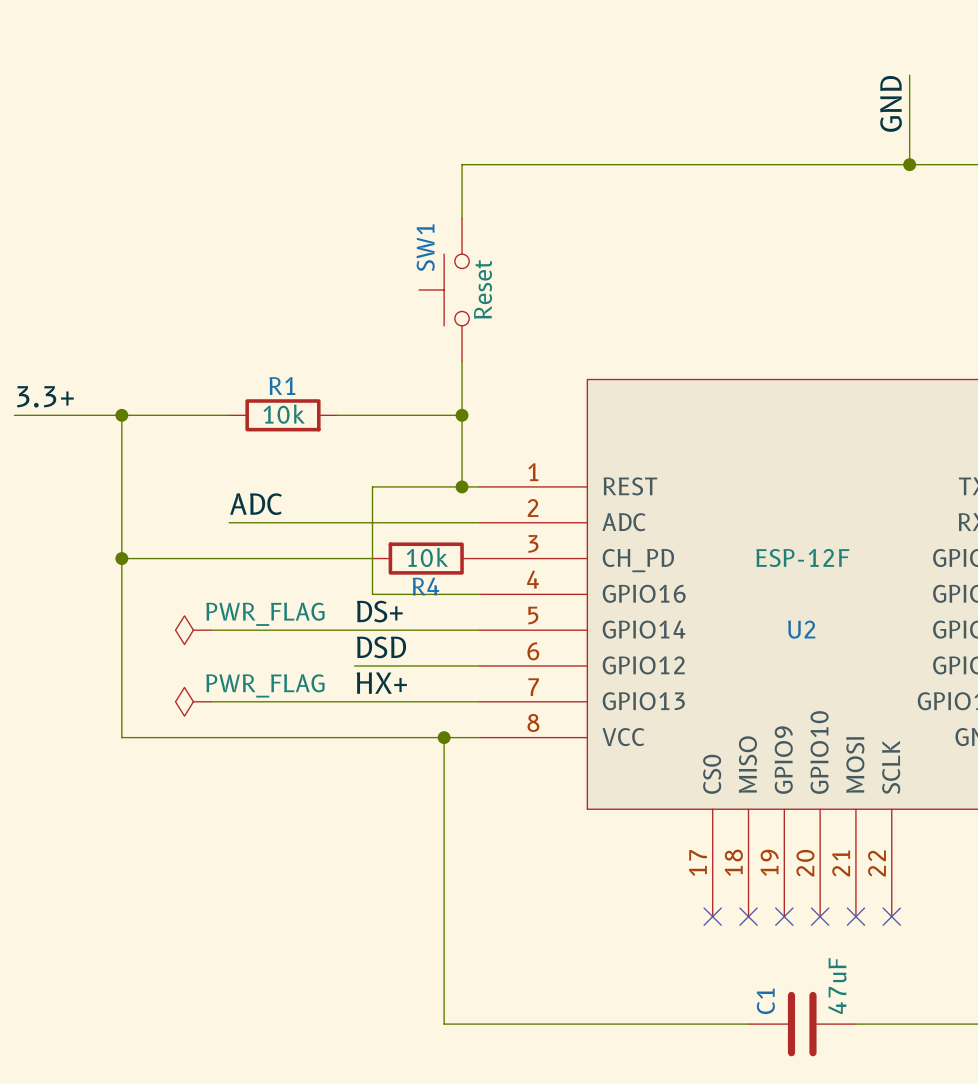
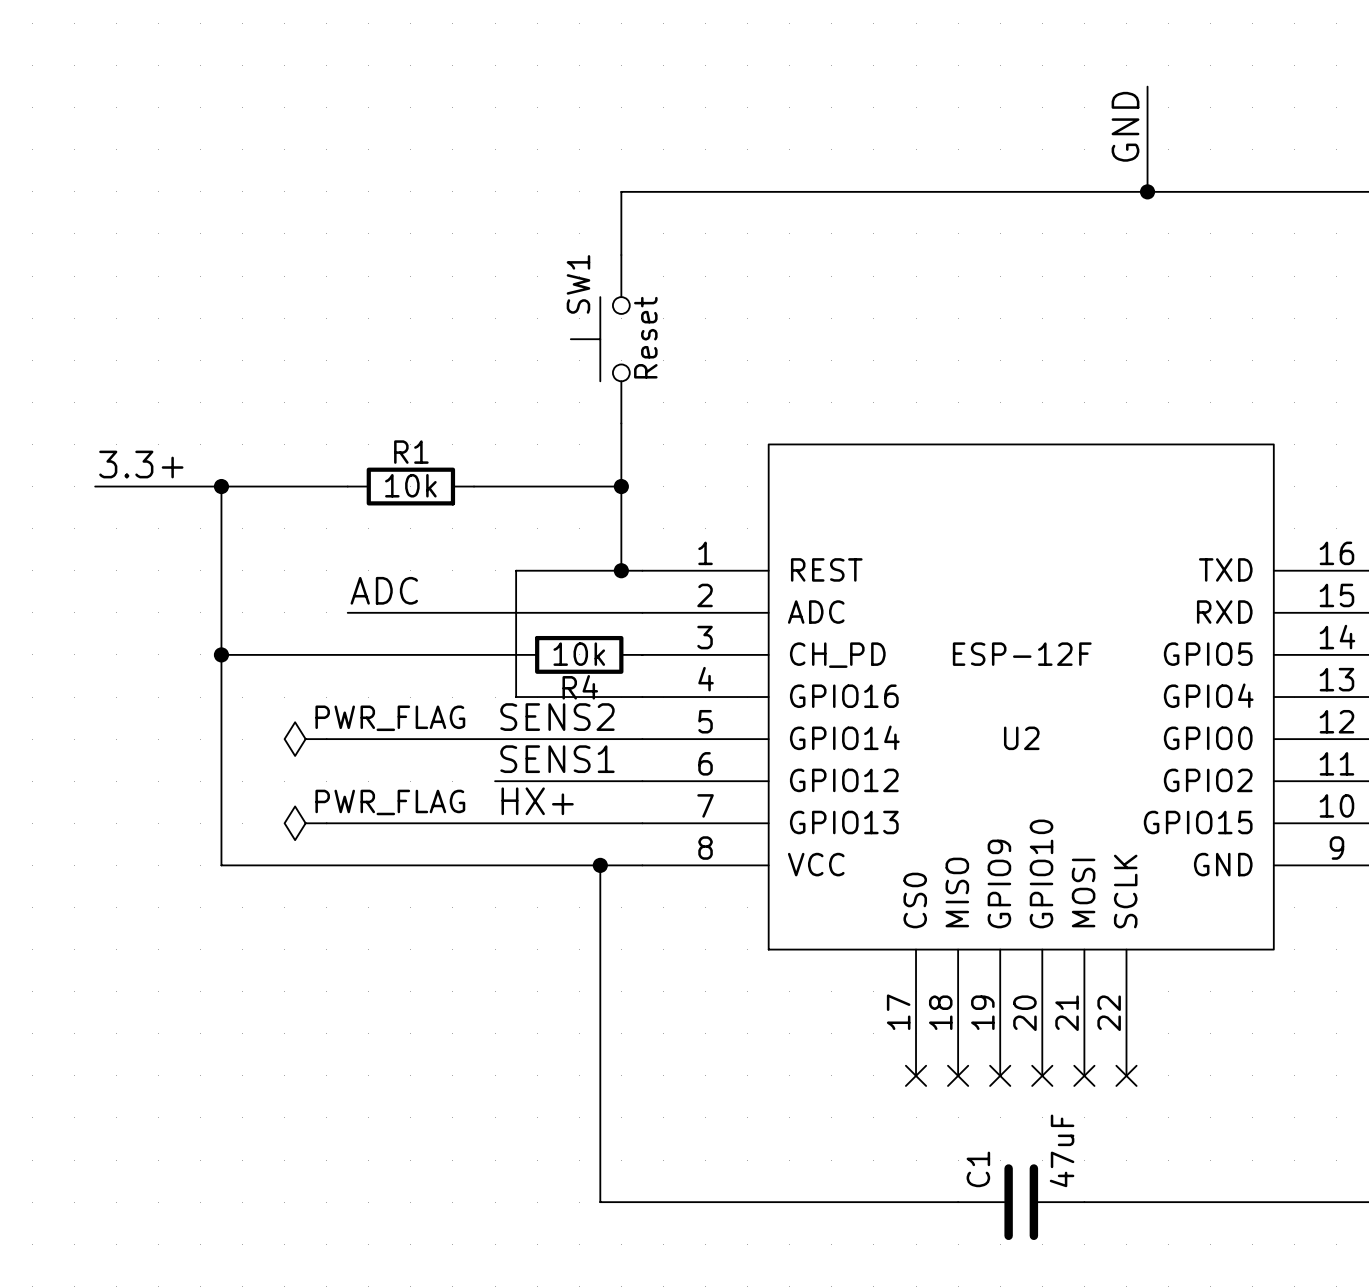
label: DS+ (379, 611) -> SENS2 (557, 717)
label: DSD (381, 647) -> SENS1 (557, 759)

